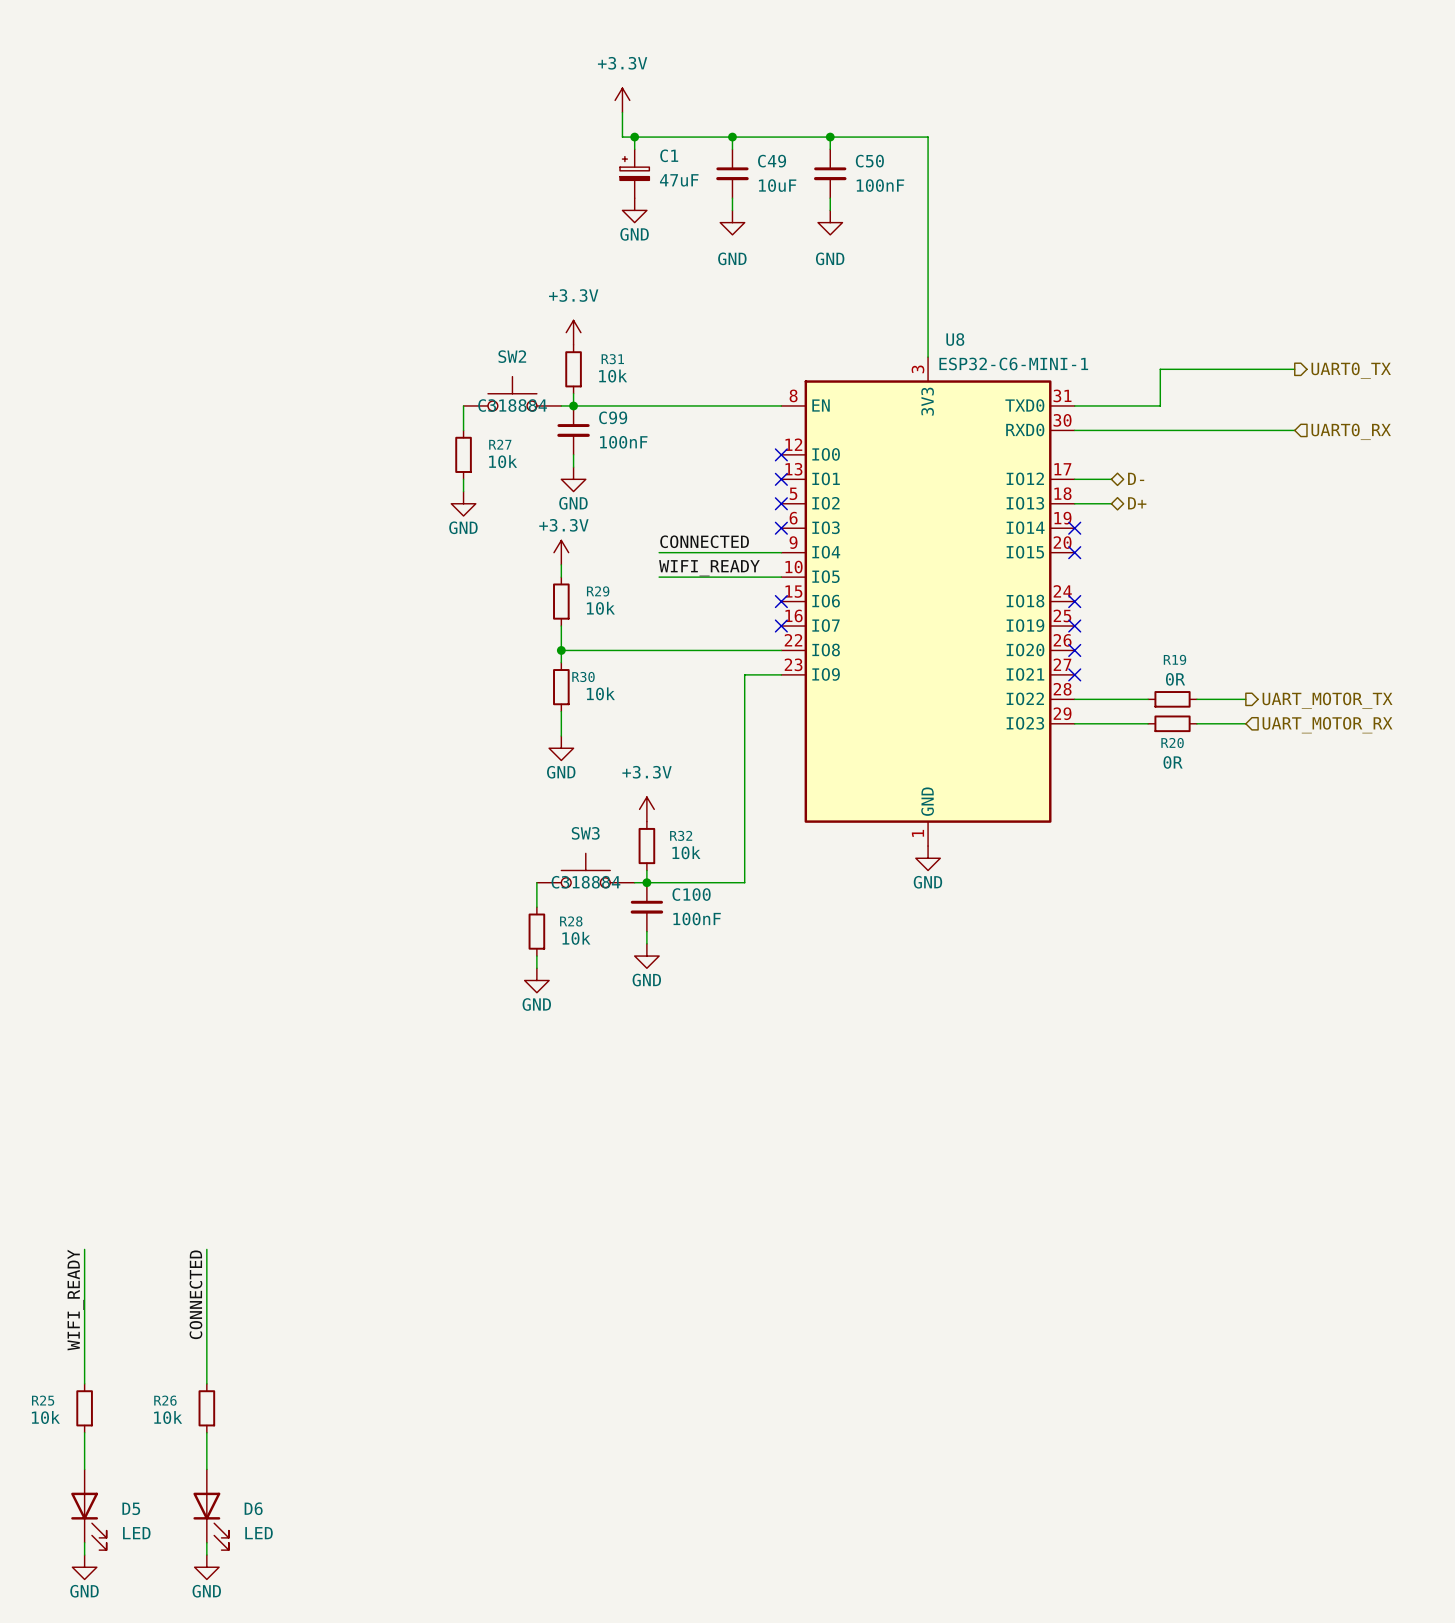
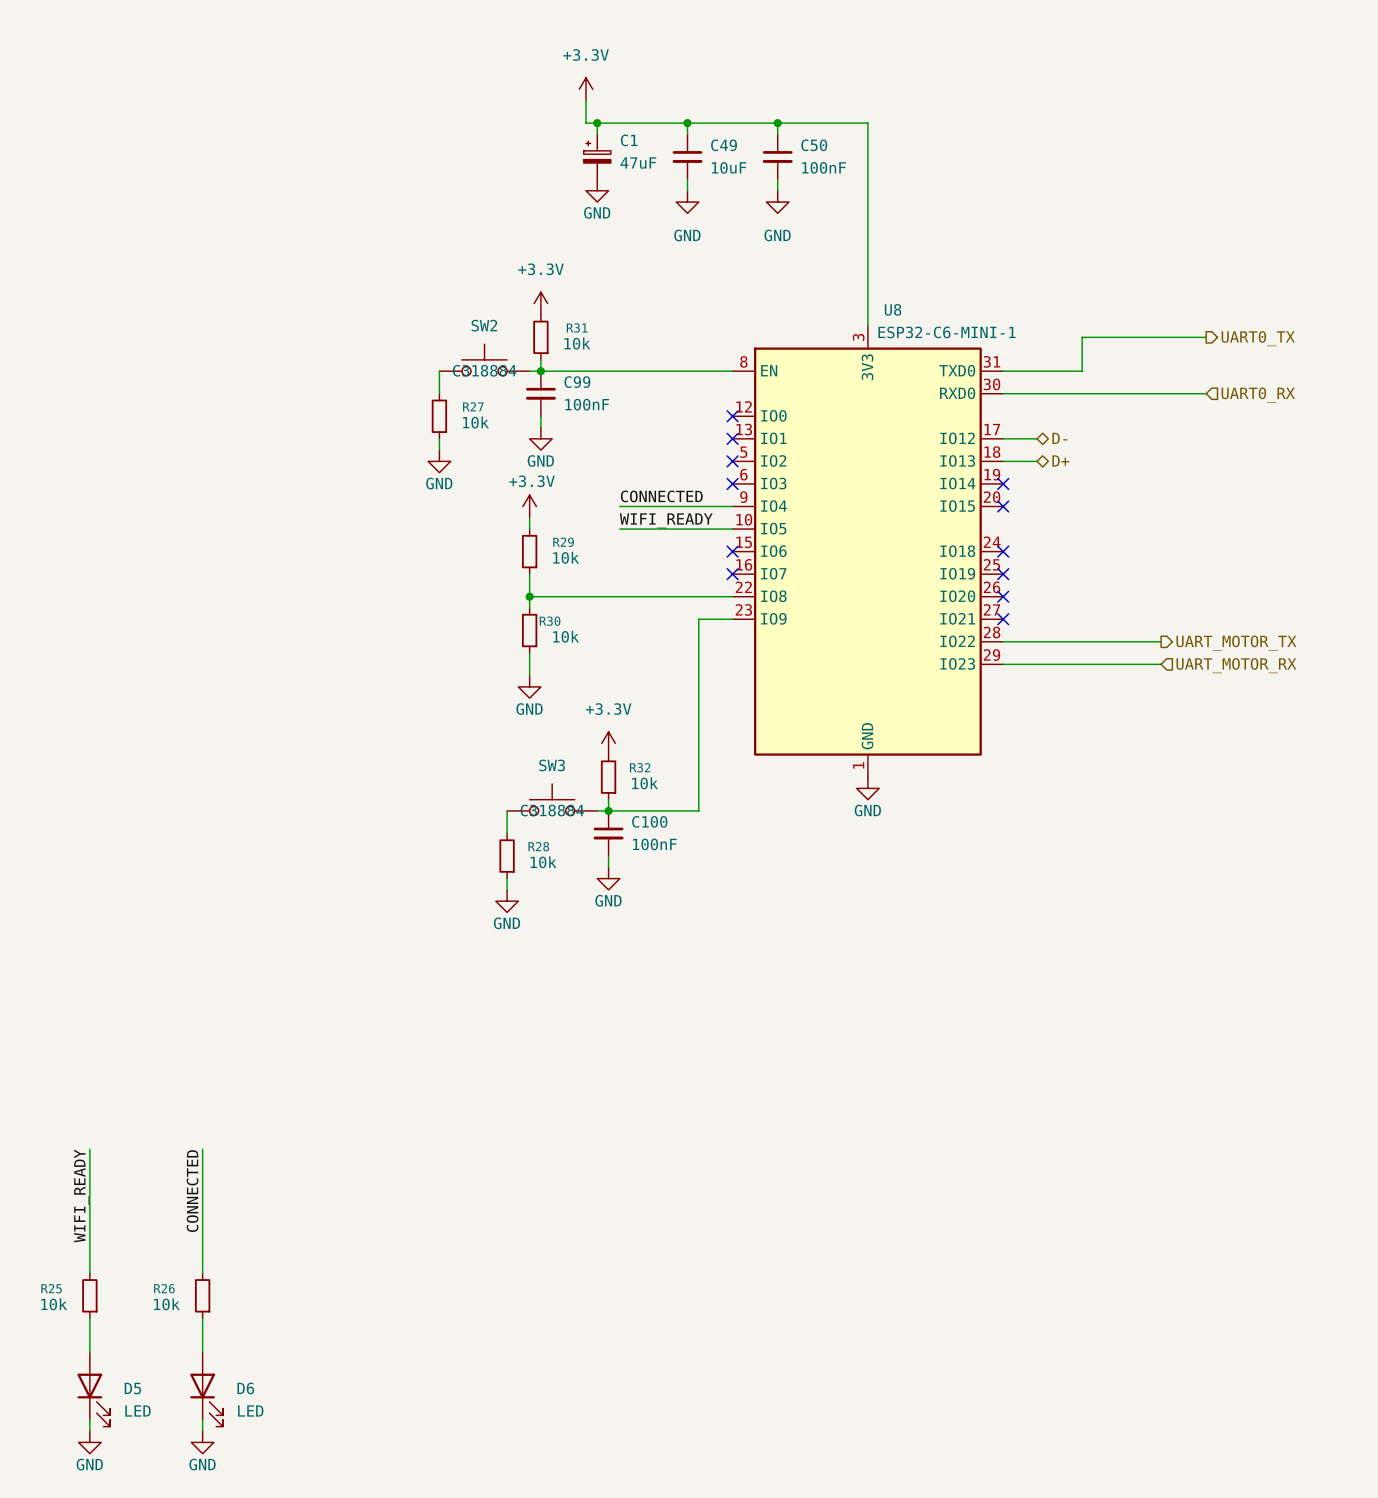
wire: none -> (1070, 641) (1115, 641)
R19: 0R (1172, 699) -> none
wire: none -> (1070, 664) (1115, 664)
R20: 0R (1172, 723) -> none

